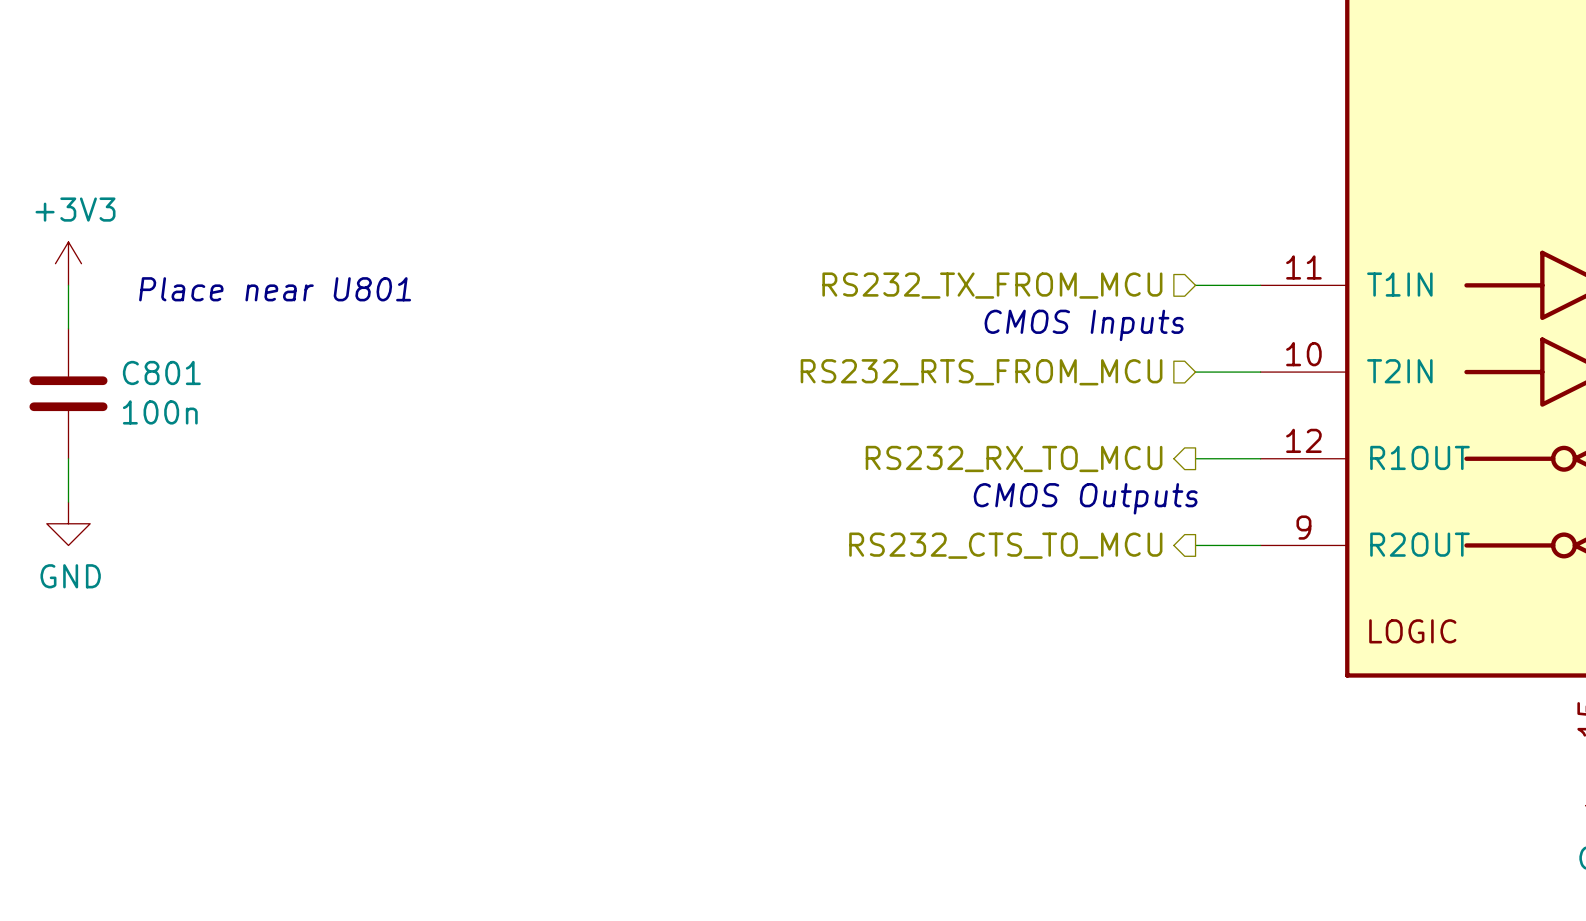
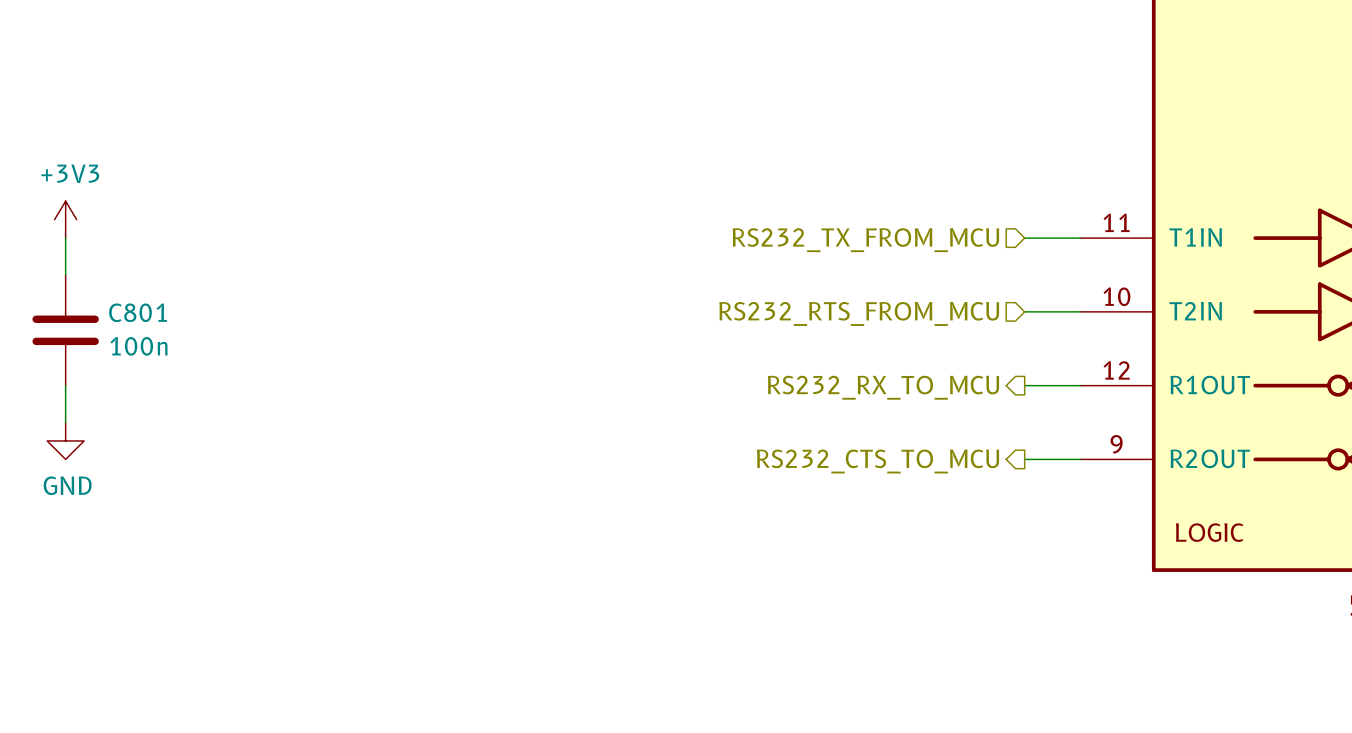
text: Place near U801 (275, 289) -> none
text: CMOS Inputs (1084, 325) -> none
text: CMOS Outputs (1085, 498) -> none

